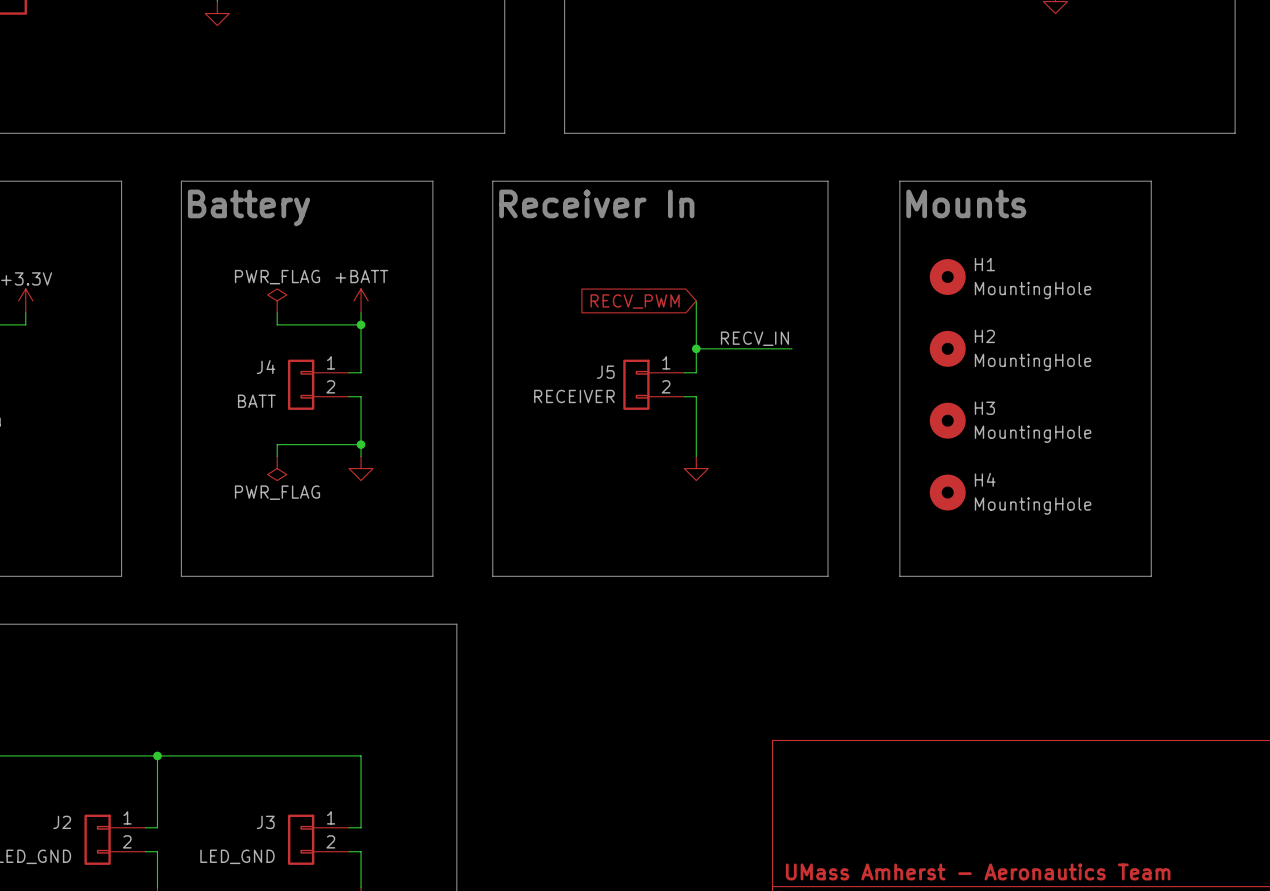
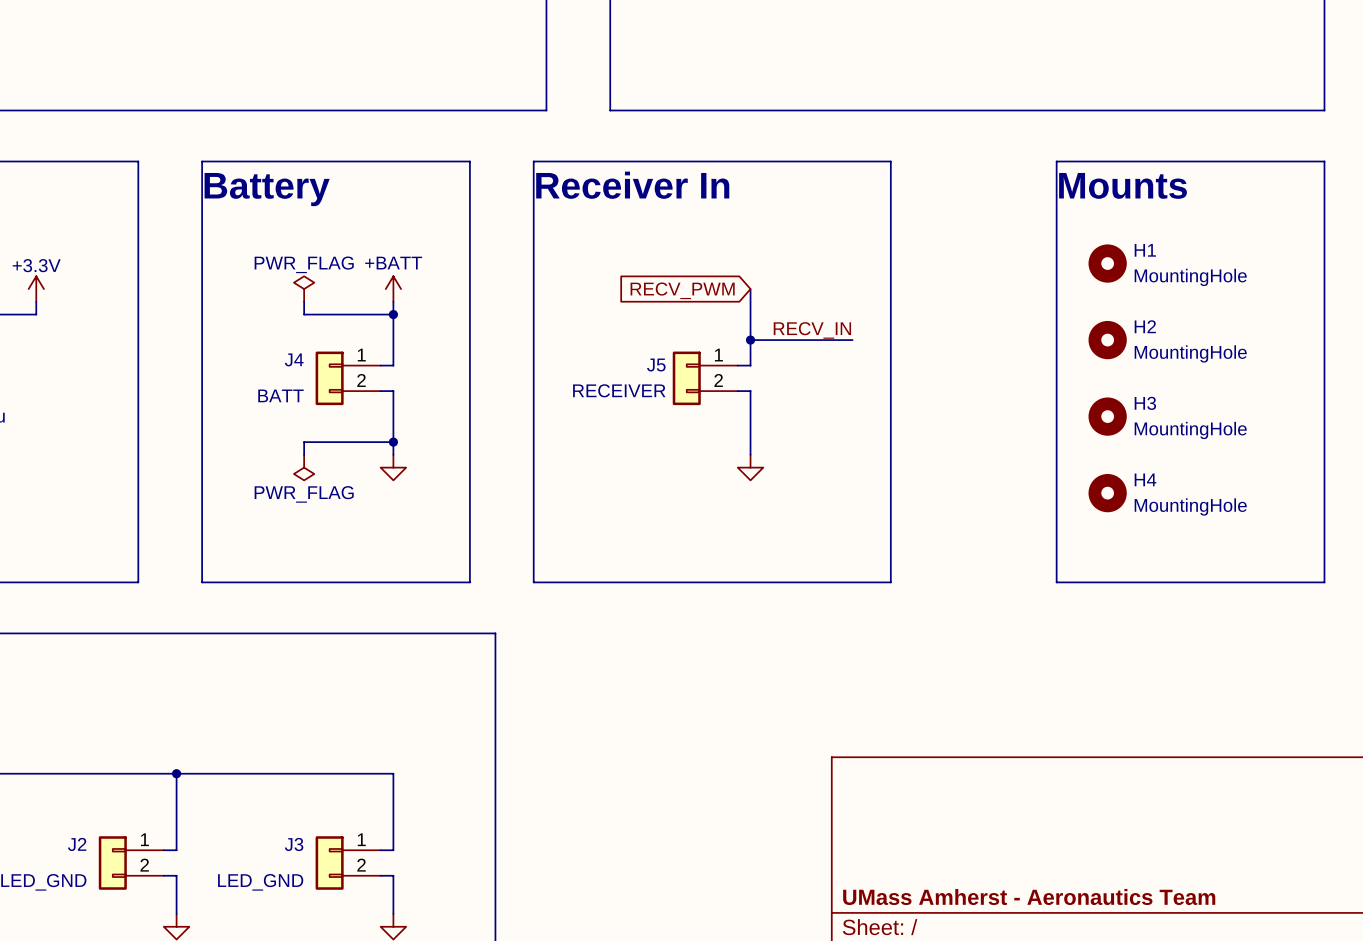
line: (983, 181) (899, 181) (899, 576) (983, 576) -> (1056, 161) (1056, 582)
line: (1151, 181) (1151, 576) -> (1235, 161) (1324, 161) (1324, 582) (1235, 582)
text position: Mounts (966, 203) -> Mounts (1123, 185)
H1 position: (947, 277) -> (1107, 263)
H2 position: (947, 348) -> (1107, 340)
H3 position: (947, 420) -> (1107, 416)
H4 position: (947, 492) -> (1107, 493)

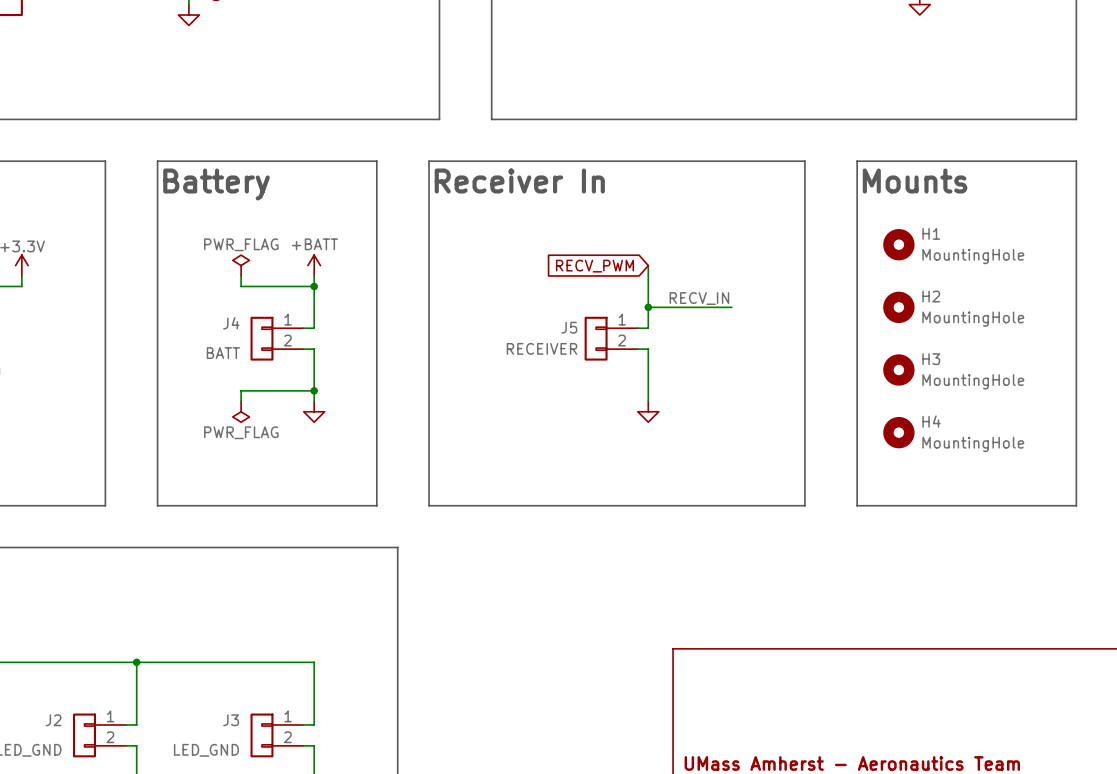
line: (890, 161) (890, 582) -> (721, 161) (804, 161) (804, 505) (721, 505)
wire: (750, 289) (750, 365) (737, 365) -> (648, 265) (648, 328) (637, 328)
global label position: RECV_PWM (682, 290) -> RECV_PWM (594, 266)
label position: RECV_IN (812, 330) -> RECV_IN (699, 298)
wire: (750, 340) (801, 340) -> (690, 307) (731, 307)
junction position: (750, 340) -> (648, 307)
J5 position: (705, 378) -> (611, 338)
wire: (737, 391) (750, 391) (750, 454) -> (637, 349) (648, 349) (648, 401)
power symbol position: (750, 467) -> (648, 411)

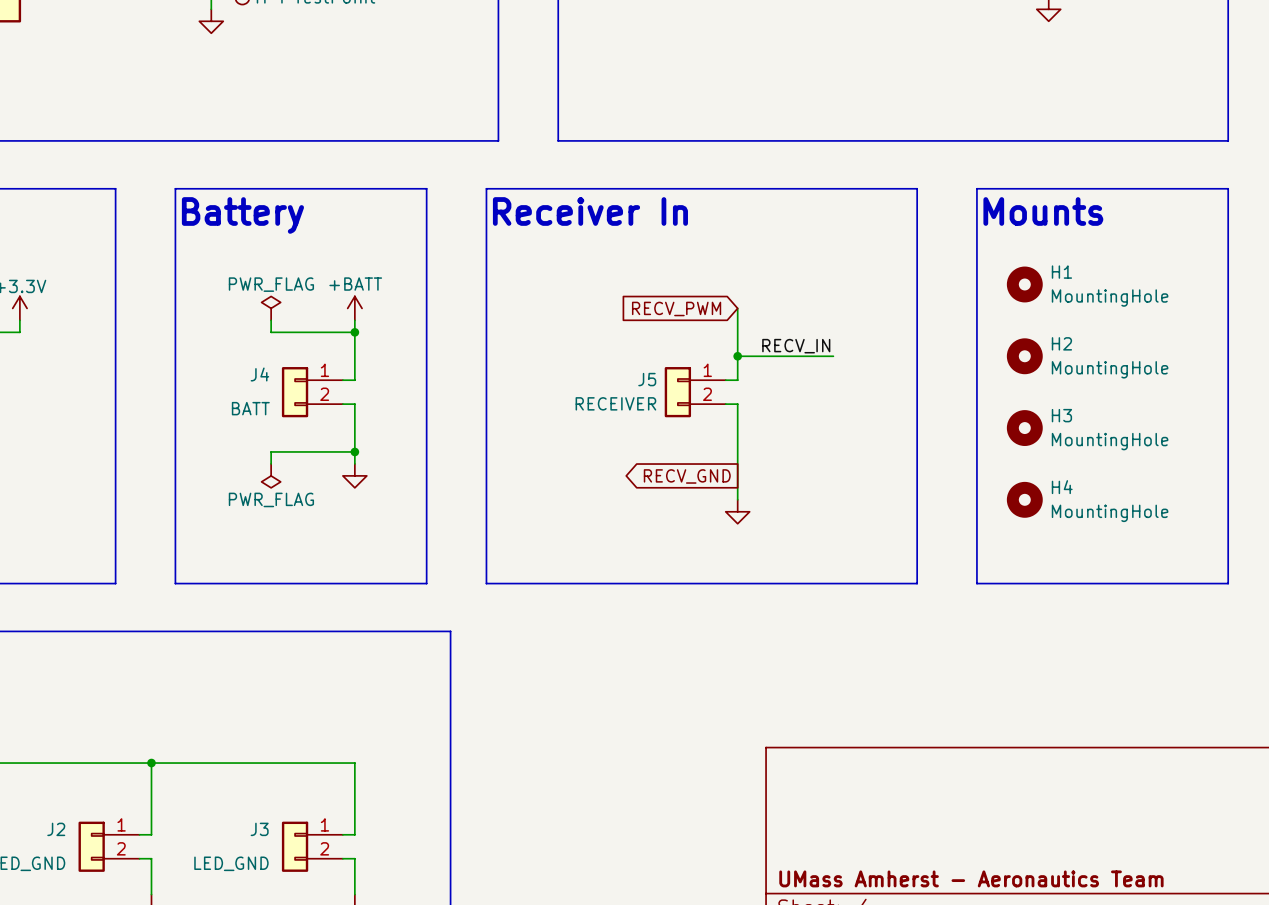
wire: none -> (737, 463) (737, 499)
power symbol position: (648, 411) -> (737, 511)
global label: none -> RECV_GND (687, 476)

